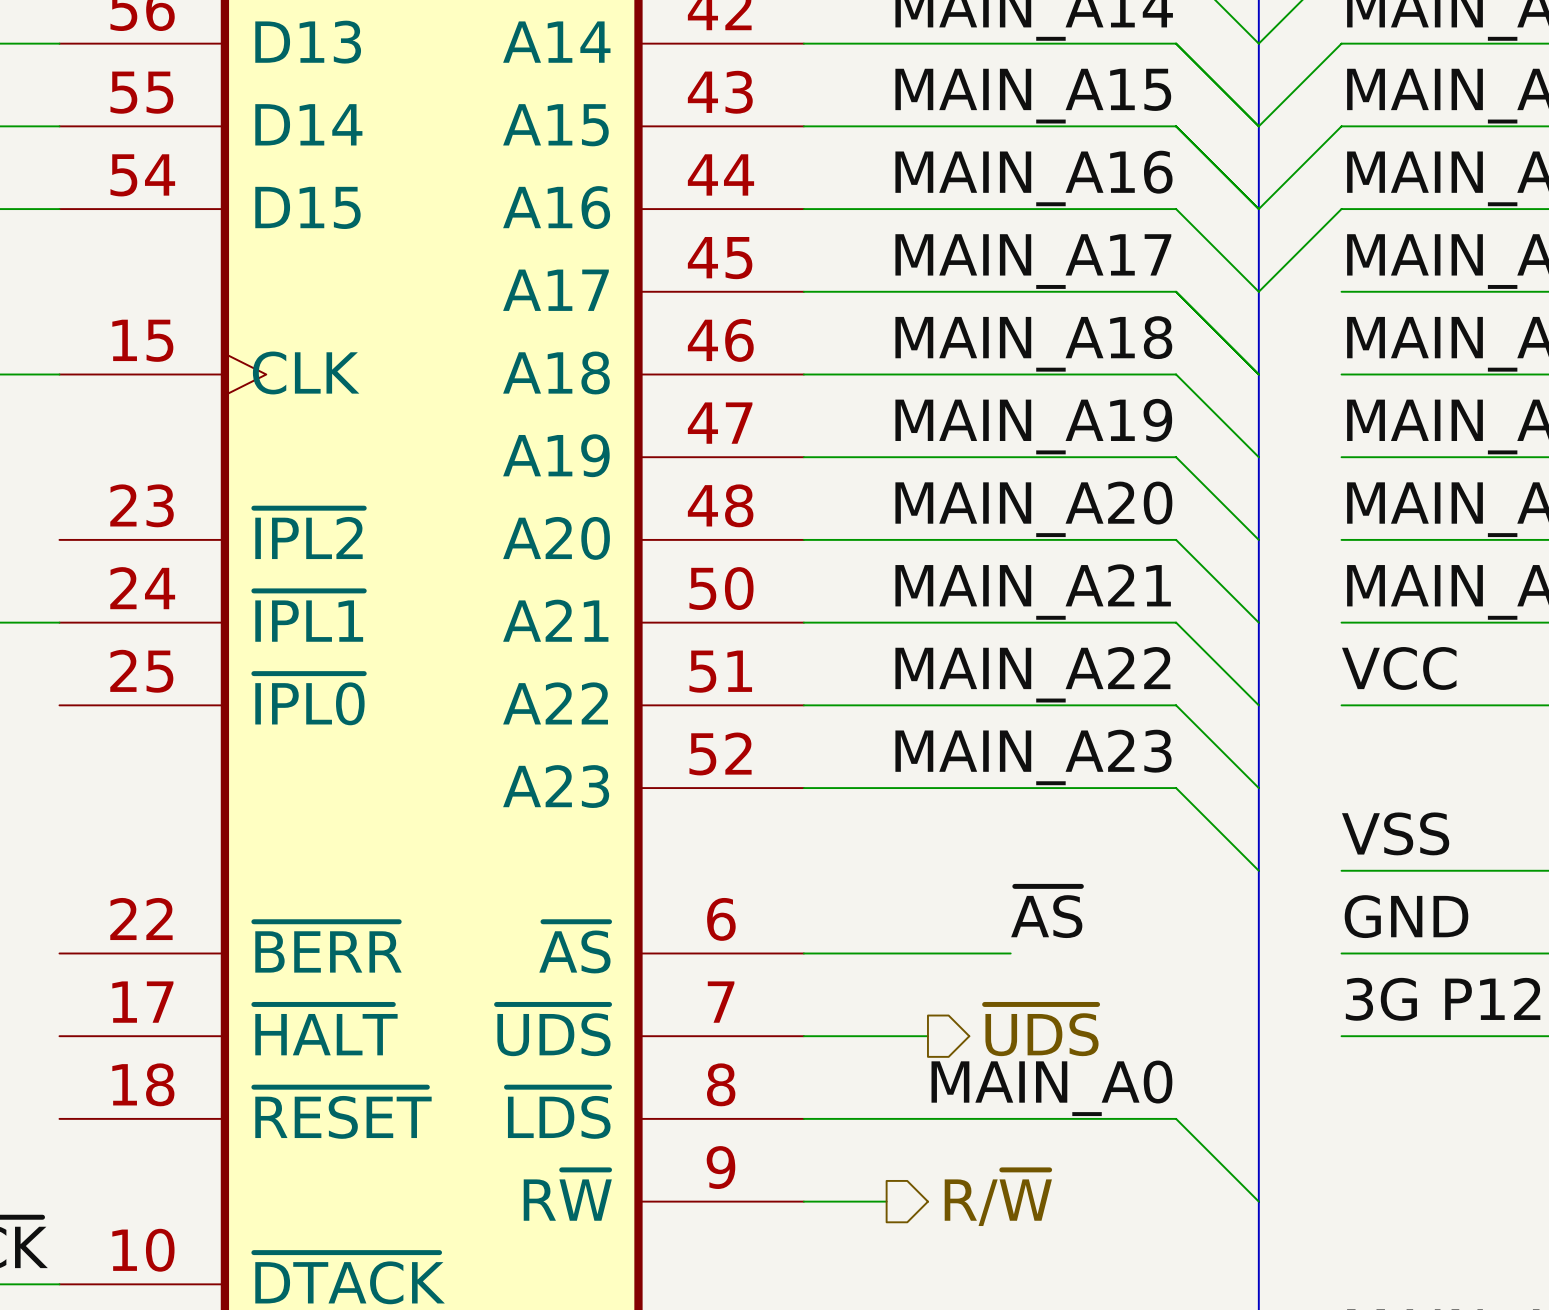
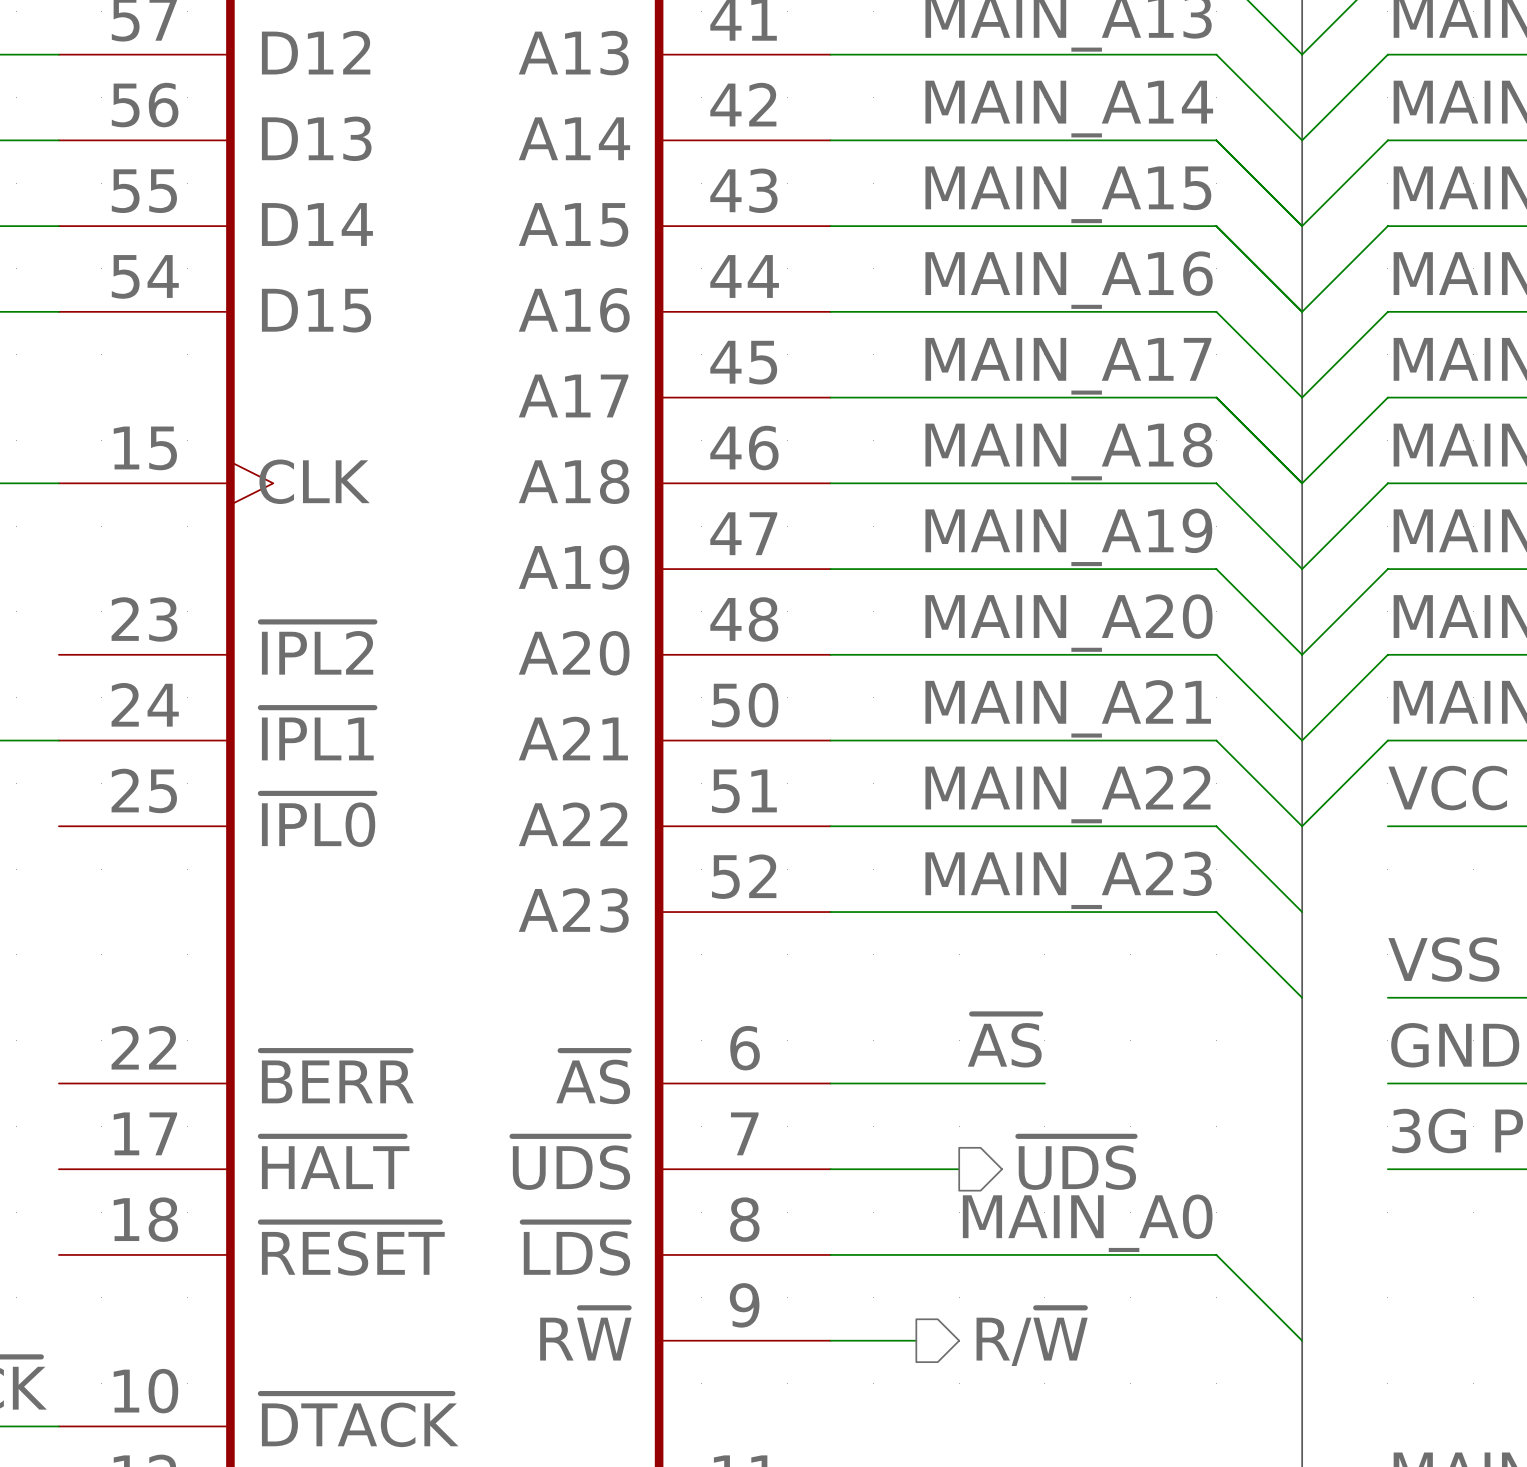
wire: none -> (1387, 397) (1302, 483)
wire: none -> (1387, 483) (1302, 569)
wire: none -> (1387, 569) (1302, 654)
wire: none -> (1387, 654) (1302, 740)
wire: none -> (1387, 740) (1302, 826)
label position: ~{AS} (1046, 912) -> ~{AS} (1004, 1040)

